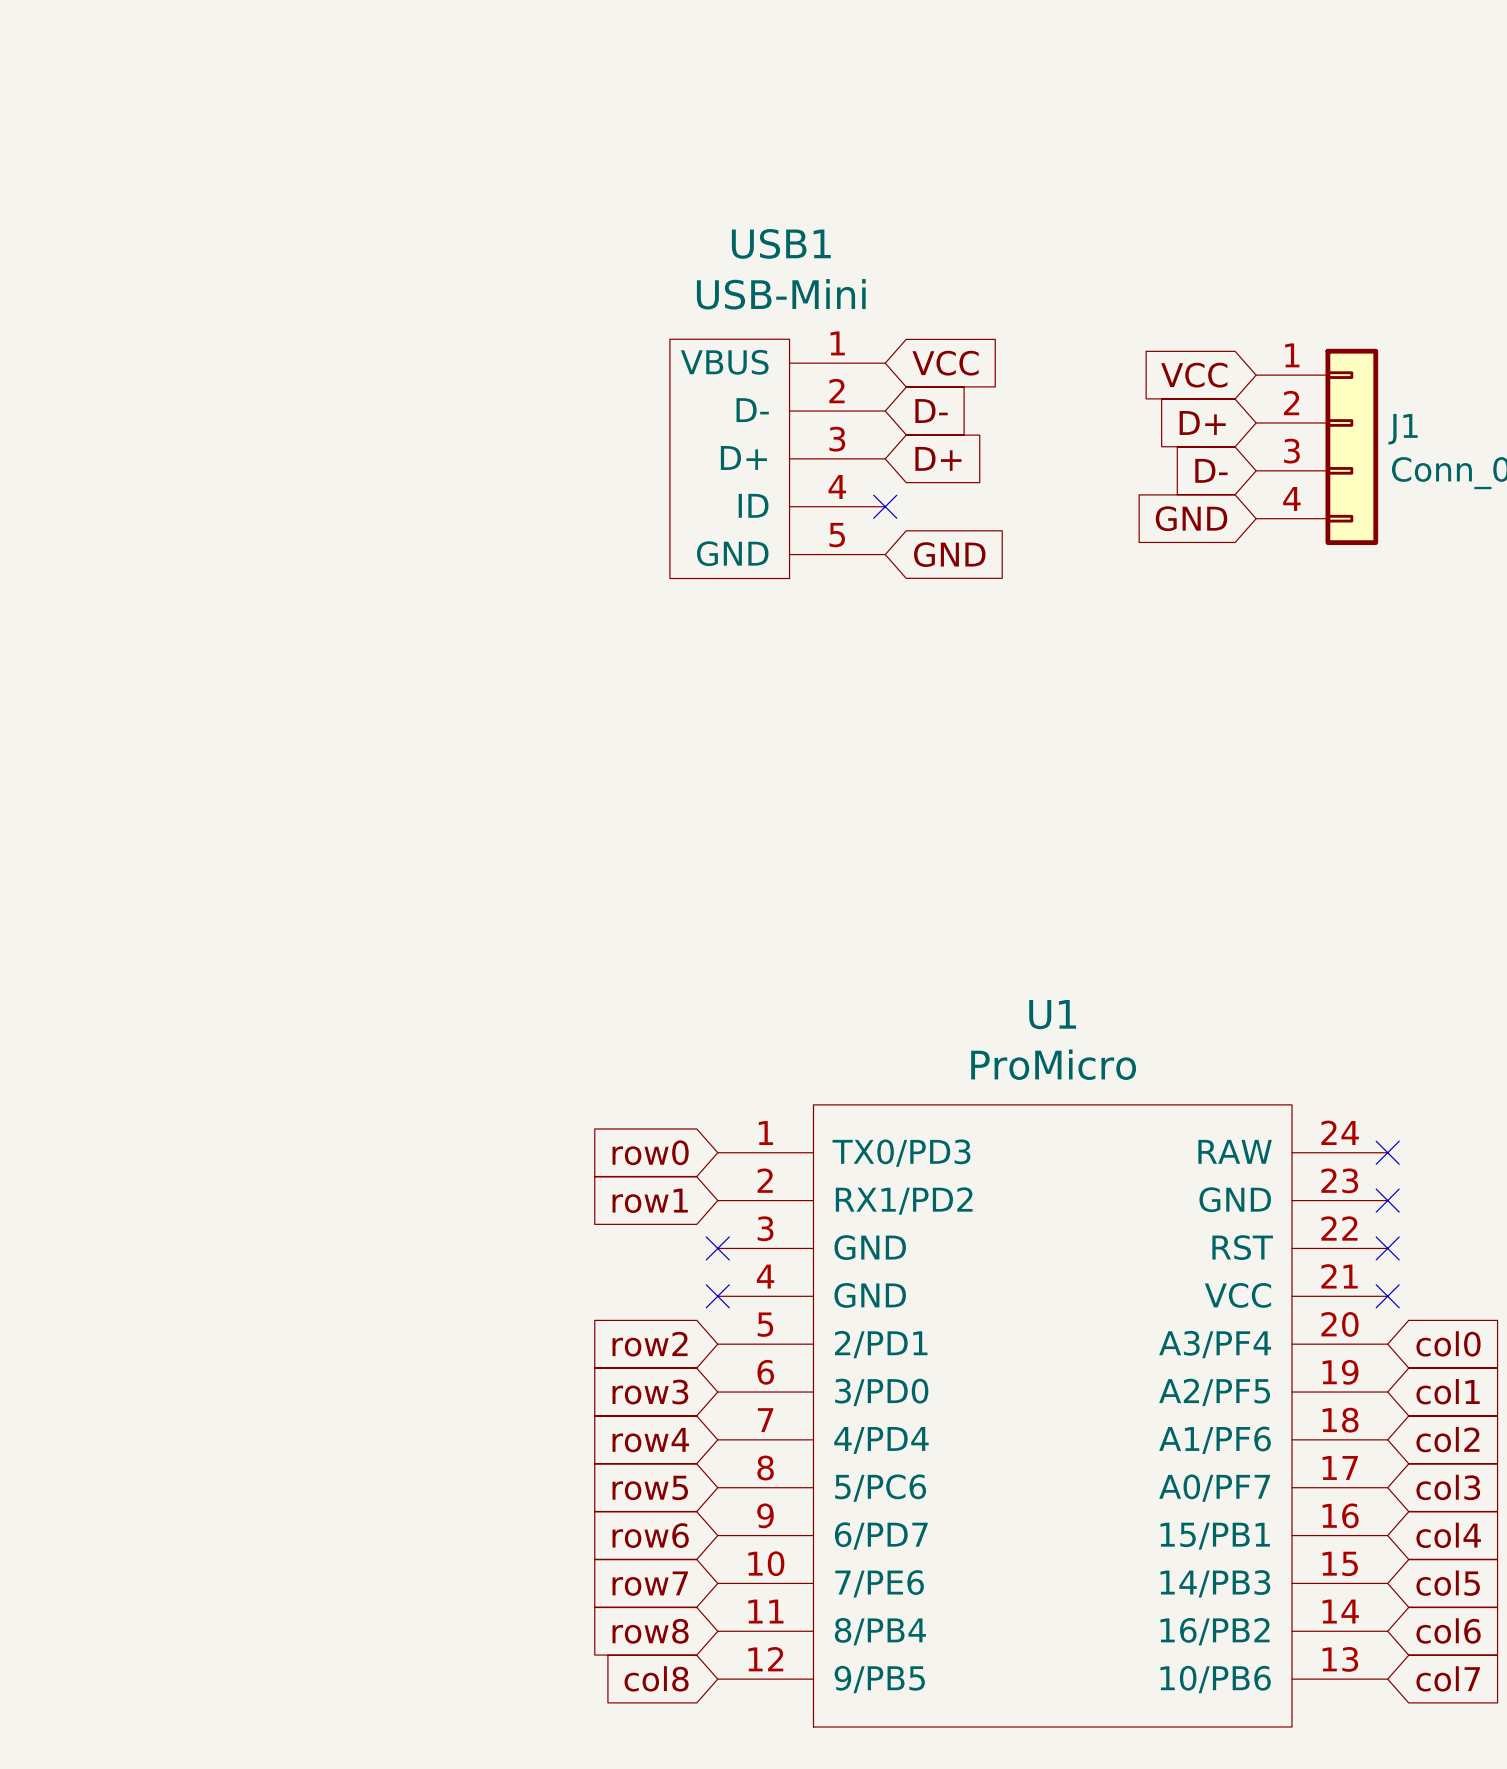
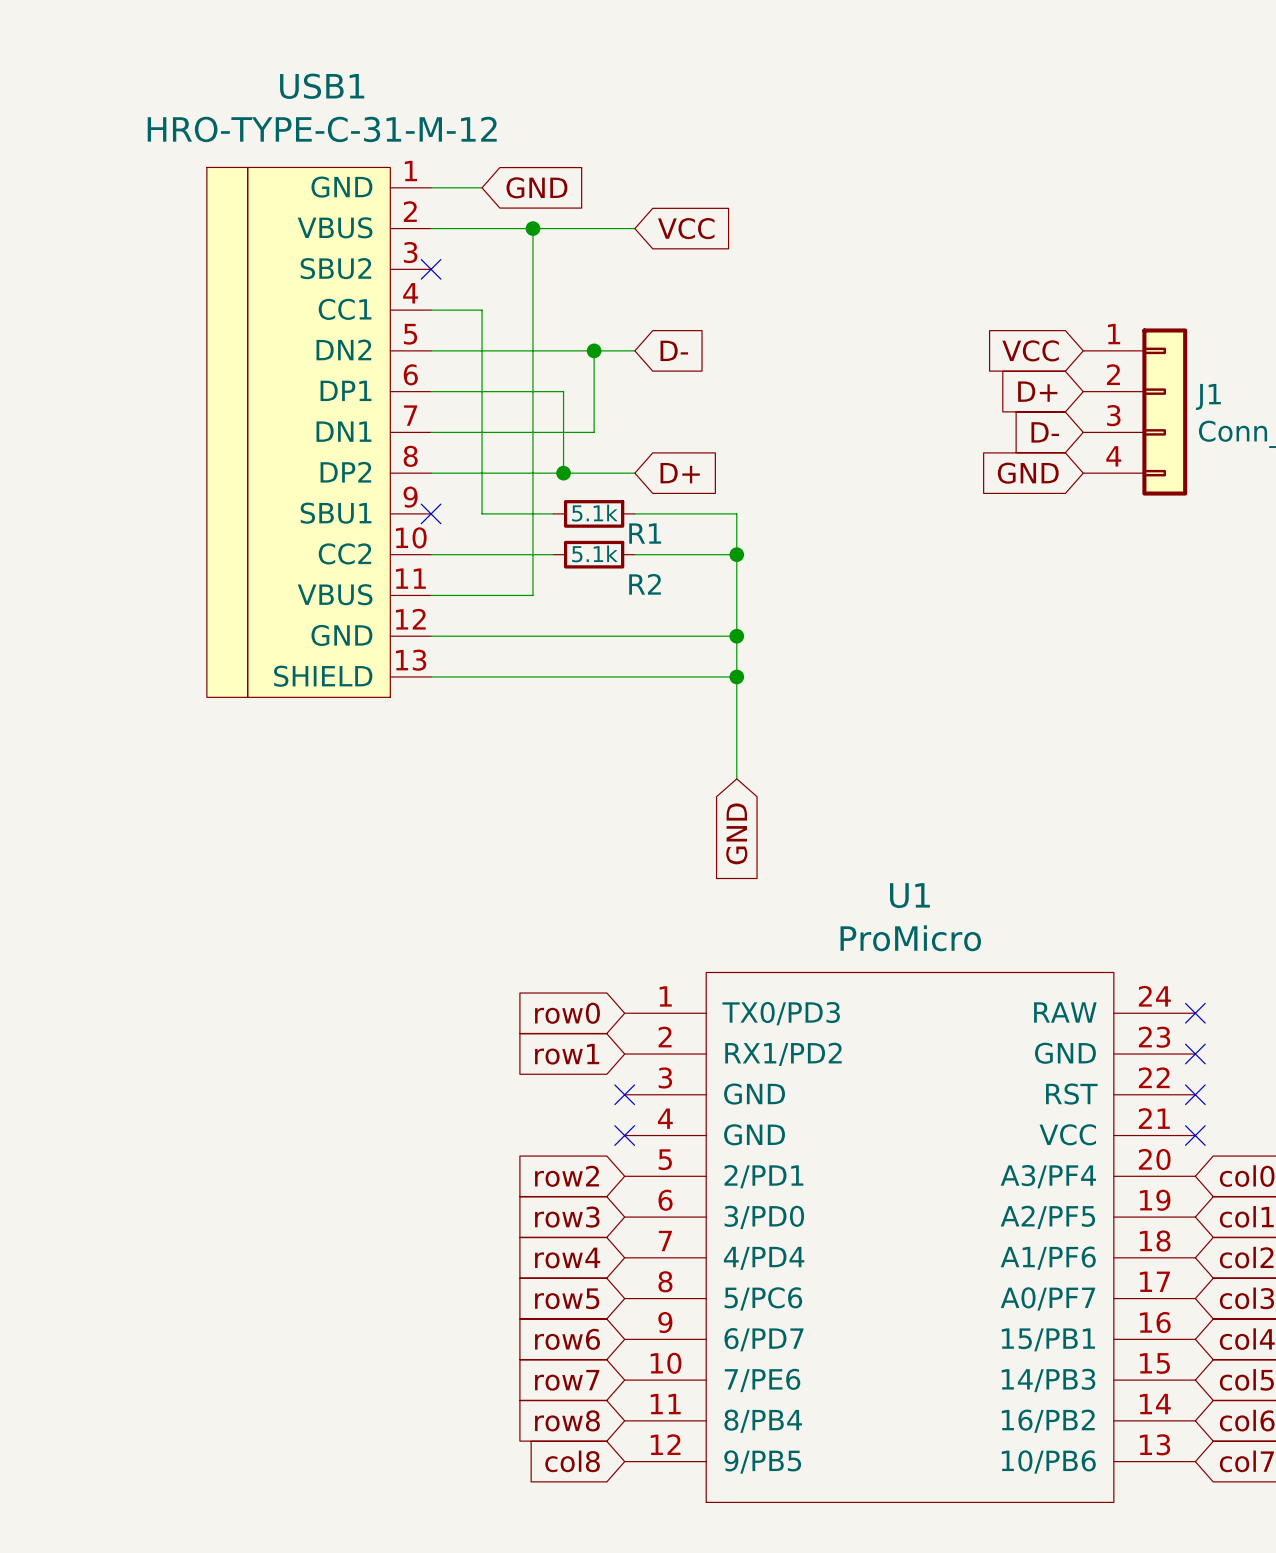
wire: none -> (431, 187) (482, 187)
global label: none -> GND (536, 187)
wire: none -> (431, 228) (634, 228)
wire: none -> (532, 228) (532, 595) (431, 595)
junction: none -> (532, 228)
USB1 name position: USB1 (781, 243) -> USB1 (322, 86)
no-connect mark: none -> (431, 269)
USB1 value: USB-Mini (781, 294) -> HRO-TYPE-C-31-M-12 (322, 129)
wire: none -> (431, 310) (482, 310) (482, 513) (553, 513)
USB1 symbol: [669, 339, 886, 579] -> [206, 167, 432, 698]
global label position: VCC (945, 363) -> VCC (686, 228)
wire: none -> (431, 350) (634, 350)
wire: none -> (594, 350) (594, 432) (431, 432)
junction: none -> (594, 350)
global label position: D- (931, 411) -> D- (674, 350)
wire: none -> (431, 391) (563, 391) (563, 473)
global label position: D+ (938, 458) -> D+ (680, 473)
no-connect mark: (885, 506) -> none
wire: none -> (431, 473) (634, 473)
junction: none -> (563, 473)
global label: GND (949, 554) -> none
no-connect mark: none -> (431, 513)
R1: none -> 5.1k (594, 513)
wire: none -> (634, 513) (736, 513) (736, 778)
wire: none -> (431, 554) (553, 554)
R2: none -> 5.1k (594, 554)
wire: none -> (634, 554) (736, 554)
junction: none -> (736, 554)
wire: none -> (431, 636) (736, 636)
junction: none -> (736, 636)
wire: none -> (431, 676) (736, 676)
junction: none -> (736, 676)
global label: none -> GND (736, 833)

